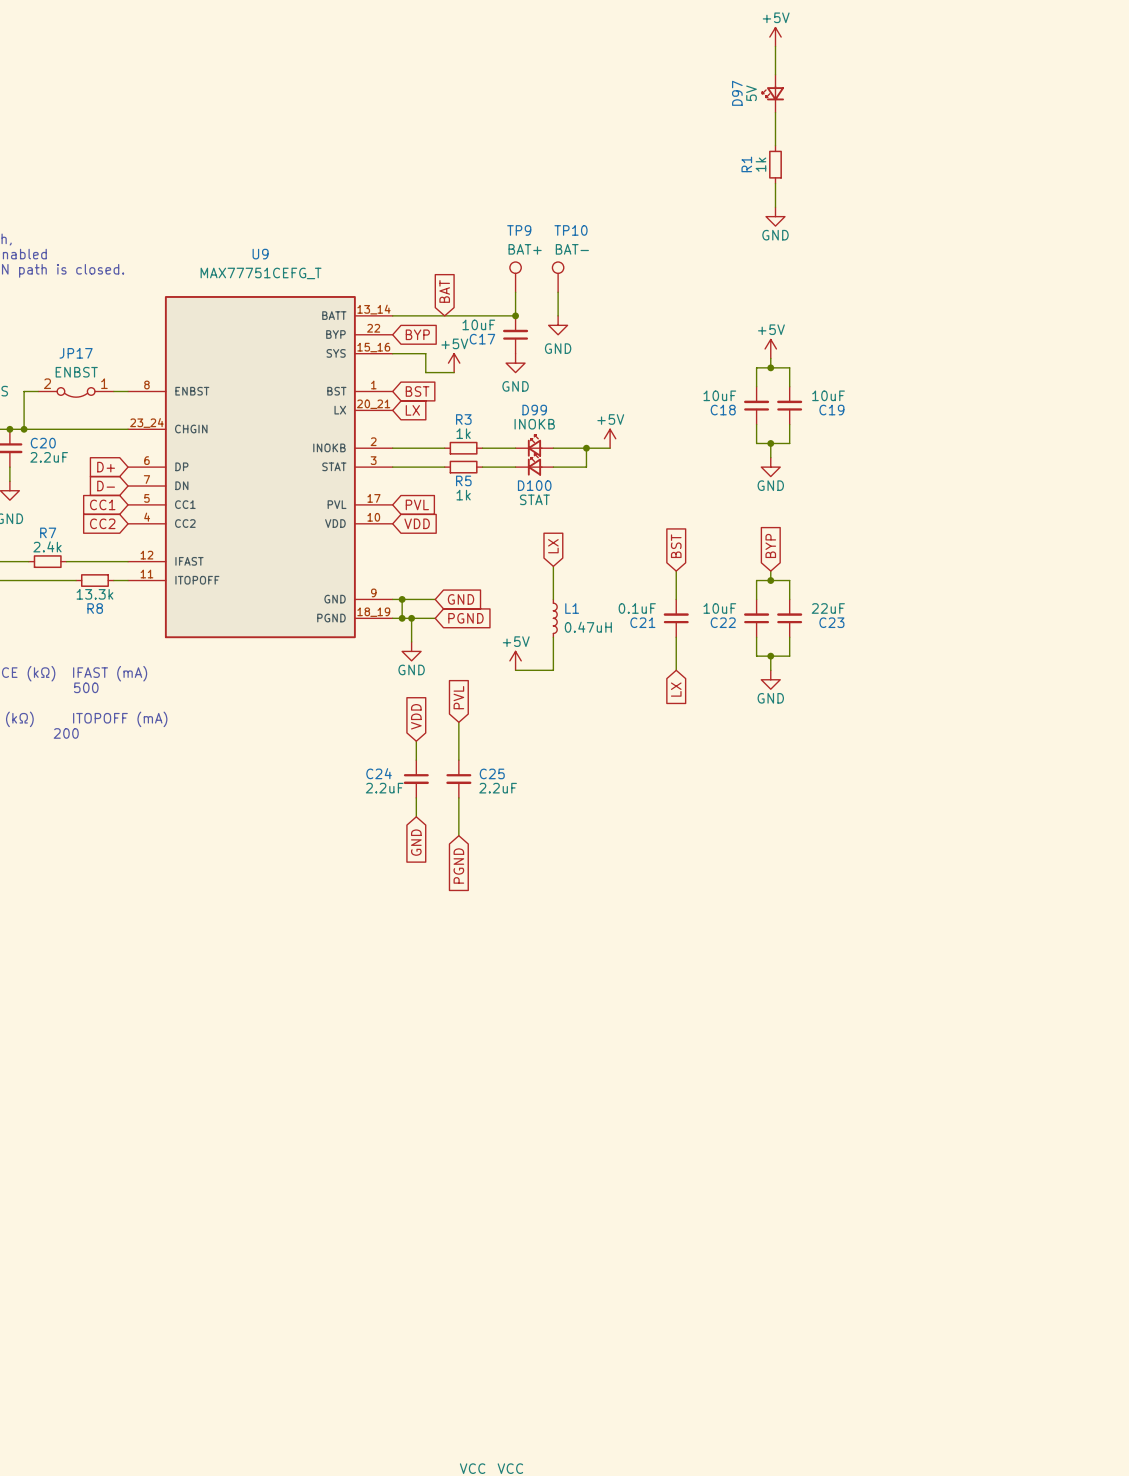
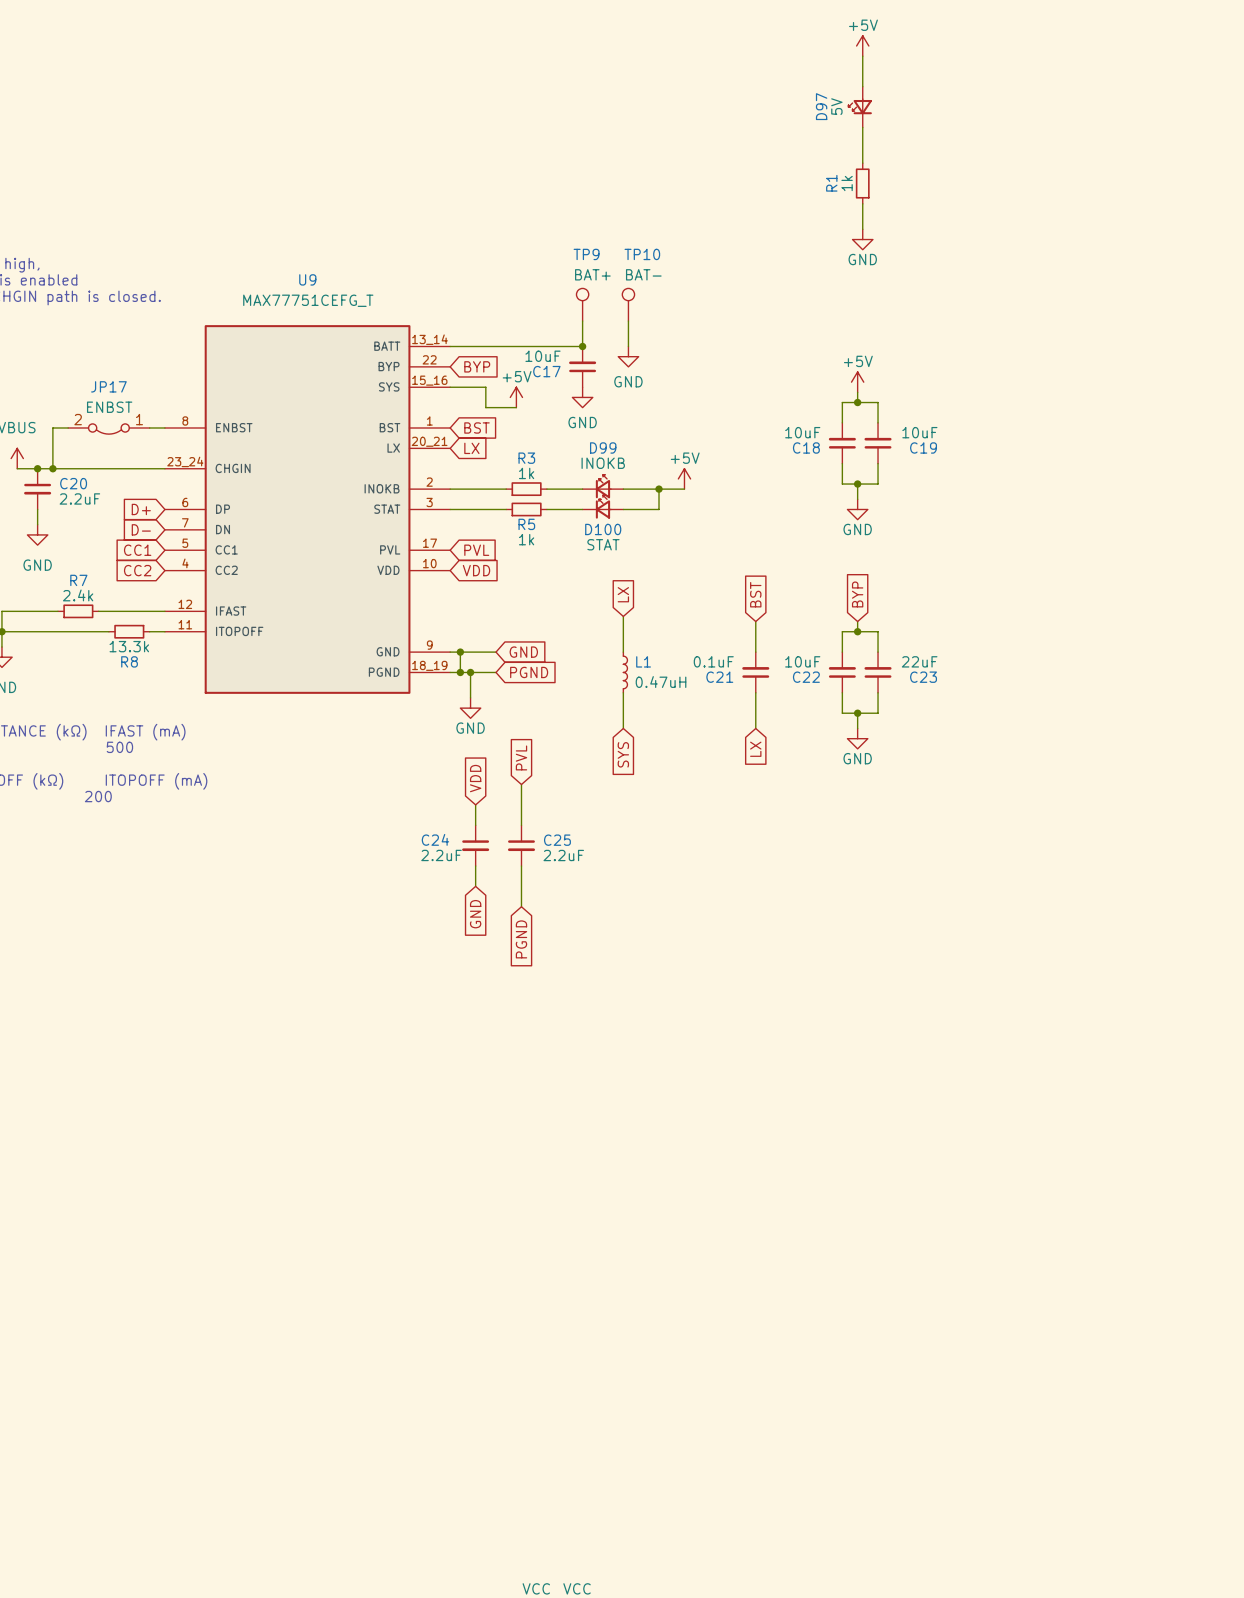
global label: BAT (444, 291) -> none
power symbol: +5V (515, 660) -> none
wire: (515, 670) (553, 670) -> none
global label: none -> SYS (623, 754)

